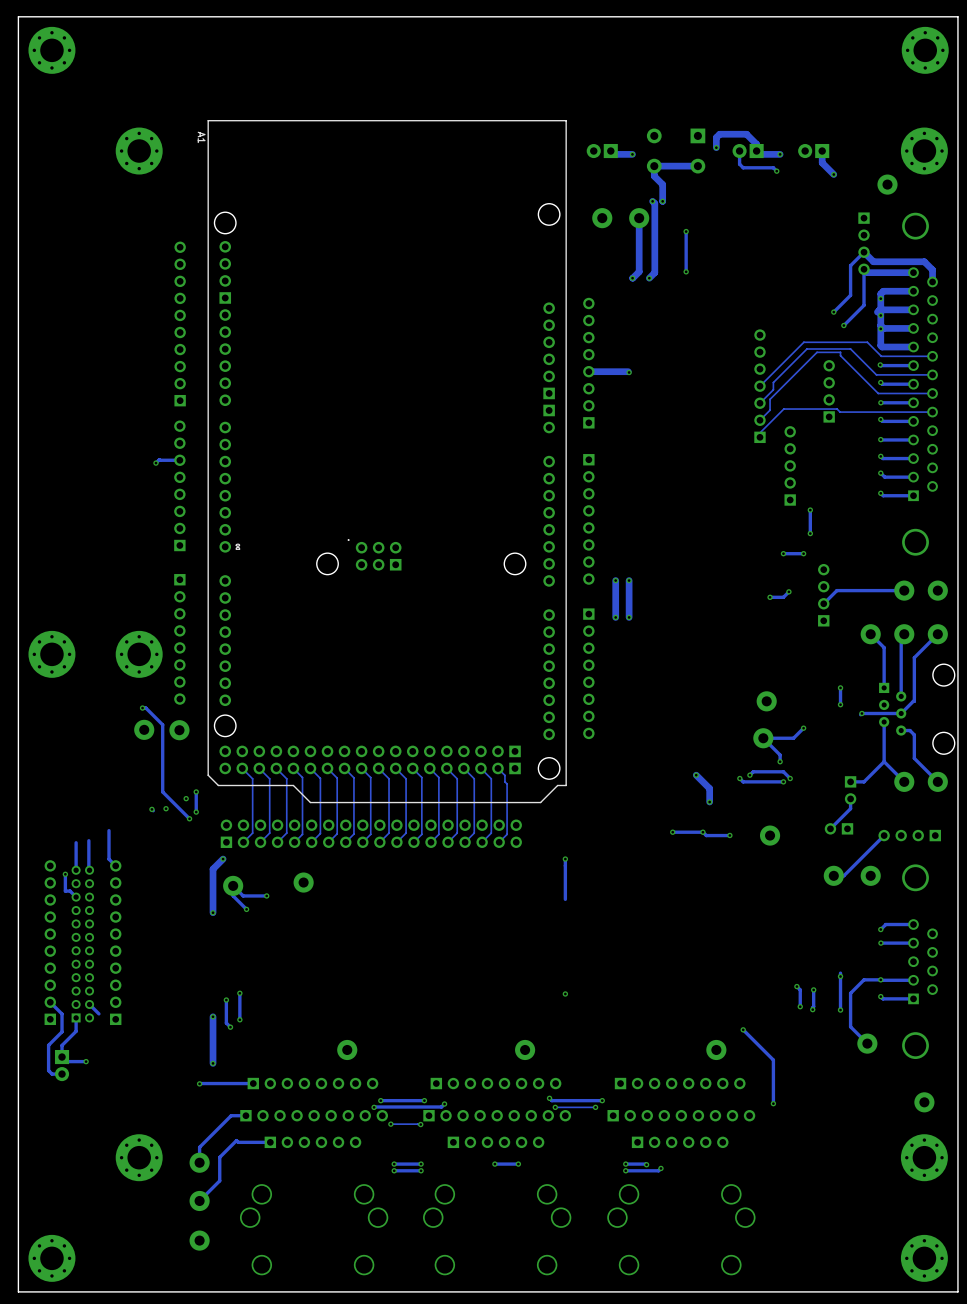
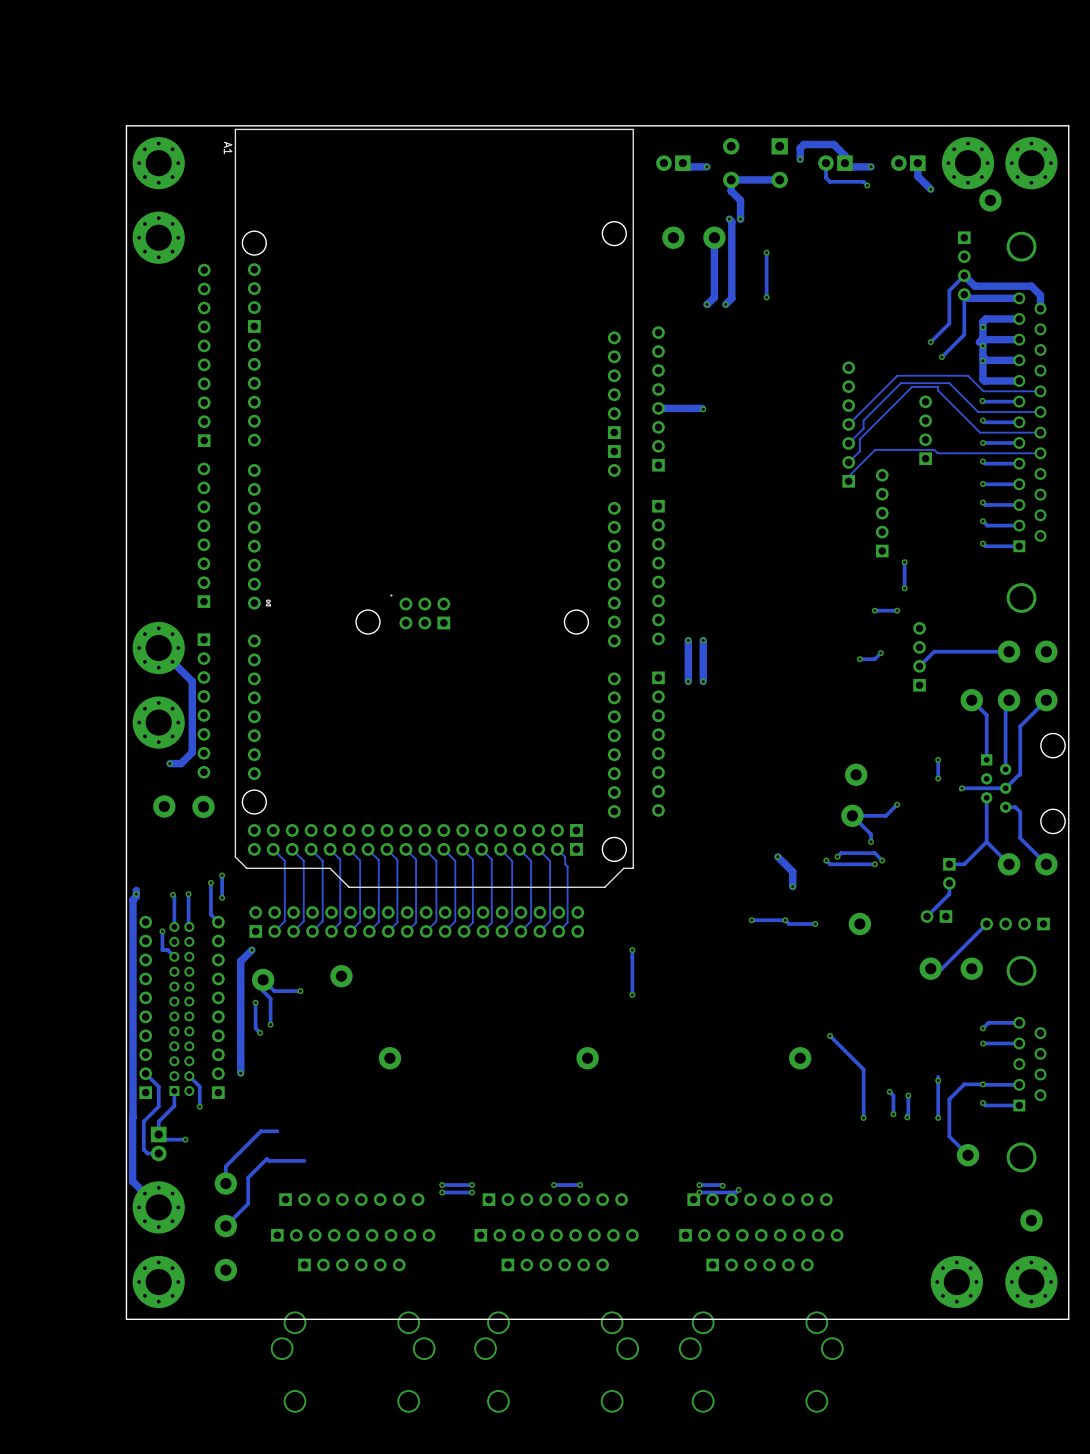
part: (51, 50) -> none
part position: (925, 50) -> (968, 163)
board edge: (957, 117) (957, 16) (18, 16) (18, 1291) (957, 1291) (957, 1191) -> (1068, 125) (126, 125) (126, 1319) (1068, 1319)
part: none -> (158, 237)
track: (179, 460) (159, 459) (155, 463) -> none
via: (155, 463) -> none
track: none -> (158, 647) (192, 681) (192, 752) (181, 763) (169, 763)
part position: (51, 654) -> (158, 647)
track: (142, 708) (145, 708) (162, 724) (162, 791) (189, 818) -> none
via position: (142, 708) -> (169, 763)
track: none -> (136, 890) (136, 896) (132, 899) (132, 1181) (158, 1207)
via: none -> (136, 894)
via: (189, 818) -> none
track: (109, 830) (109, 859) (115, 865) -> (210, 882) (210, 914) (218, 922)
track: (88, 840) (89, 870) -> (188, 894) (189, 926)
track: (76, 842) (76, 870) -> (174, 896) (174, 926)
via: none -> (162, 931)
track: (65, 874) (65, 891) (70, 891) (76, 897) -> (162, 931) (162, 950) (167, 950) (174, 956)
via: (65, 874) -> none
via: none -> (632, 994)
track: (239, 902) (246, 909) -> (270, 998) (270, 1024)
via: none -> (255, 1002)
via: (246, 909) -> none
part: none -> (218, 1007)
track: none -> (240, 1009) (240, 1073)
via: (213, 912) -> none
via: none -> (270, 1024)
via: none -> (260, 1032)
via: none -> (830, 1035)
part: (50, 942) -> none
part position: (115, 942) -> (145, 1007)
part position: (82, 944) -> (181, 1009)
part: none -> (389, 1058)
via: none -> (240, 1073)
track: none -> (189, 1076) (199, 1086) (199, 1106)
track: (239, 993) (239, 1019) -> none
via: (239, 993) -> none
via: (565, 993) -> none
via: none -> (199, 1106)
track: (226, 1000) (226, 1023) (230, 1027) -> (255, 1002) (255, 1028) (260, 1032)
via: (226, 1000) -> none
track: (50, 1002) (62, 1014) (62, 1031) (48, 1045) (48, 1070) (52, 1074) (62, 1074) -> (145, 1073) (158, 1086) (158, 1106) (143, 1121) (143, 1149) (147, 1153) (158, 1153)
track: (89, 1004) (98, 1013) -> none
track: (213, 1016) (213, 1063) -> none
via: (213, 1016) -> none
track: (76, 1017) (76, 1031) (62, 1045) (62, 1057) (66, 1061) (86, 1061) -> (174, 1091) (174, 1105) (158, 1121) (158, 1134) (163, 1139) (185, 1139)
via: (239, 1019) -> none
via: (230, 1027) -> none
via: none -> (185, 1139)
track: (743, 1029) (773, 1060) (773, 1103) -> (830, 1035) (863, 1069) (863, 1117)
via position: (743, 1029) -> (863, 1117)
part: (347, 1049) -> none
part position: (525, 1049) -> (587, 1058)
part position: (716, 1049) -> (800, 1058)
via: (86, 1061) -> none
via: (213, 1063) -> none
part position: (62, 1065) -> (158, 1144)
part: none -> (225, 1183)
via: none -> (442, 1185)
via: none -> (472, 1185)
via: none -> (554, 1185)
via: none -> (580, 1185)
via: none -> (699, 1185)
via: none -> (722, 1185)
via: none -> (738, 1189)
via: none -> (442, 1192)
via: none -> (472, 1192)
via: none -> (699, 1192)
via: (199, 1083) -> none
track: (253, 1083) (199, 1083) -> none
part: none -> (158, 1207)
track: (549, 1098) (551, 1100) (602, 1100) -> none
via: (549, 1098) -> none
via: (380, 1100) -> none
track: (424, 1100) (380, 1100) -> none
via: (424, 1100) -> none
via: (602, 1100) -> none
via: (773, 1103) -> none
track: (444, 1104) (441, 1106) (374, 1107) -> none
via: (444, 1104) -> none
part: none -> (225, 1226)
via: (374, 1107) -> none
via: (555, 1107) -> none
track: (595, 1107) (555, 1107) -> none
via: (595, 1107) -> none
track: (245, 1115) (231, 1115) (199, 1147) (199, 1162) -> (277, 1131) (260, 1131) (225, 1166) (225, 1183)
track: (390, 1124) (420, 1124) -> none
via: (390, 1124) -> none
via: (420, 1124) -> none
track: (270, 1142) (238, 1142) (236, 1140) (219, 1157) (219, 1180) (199, 1200) -> (304, 1160) (268, 1160) (266, 1158) (248, 1177) (248, 1203) (225, 1226)
part position: (199, 1162) -> (225, 1270)
via: (394, 1164) -> none
track: (421, 1164) (394, 1164) -> (472, 1185) (442, 1185)
via: (421, 1164) -> none
via: (494, 1164) -> none
track: (518, 1164) (494, 1164) -> (580, 1185) (554, 1185)
via: (518, 1164) -> none
track: (625, 1164) (646, 1164) -> (699, 1185) (722, 1185)
via: (625, 1164) -> none
via: (646, 1164) -> none
track: (660, 1168) (658, 1170) (625, 1170) -> (738, 1189) (736, 1192) (699, 1192)
via: (660, 1168) -> none
via: (394, 1170) -> none
track: (421, 1170) (394, 1170) -> (472, 1192) (442, 1192)
via: (421, 1170) -> none
via: (625, 1170) -> none
part: (199, 1200) -> none
part: (199, 1240) -> none
part: (51, 1258) -> none
part position: (924, 1258) -> (956, 1282)

